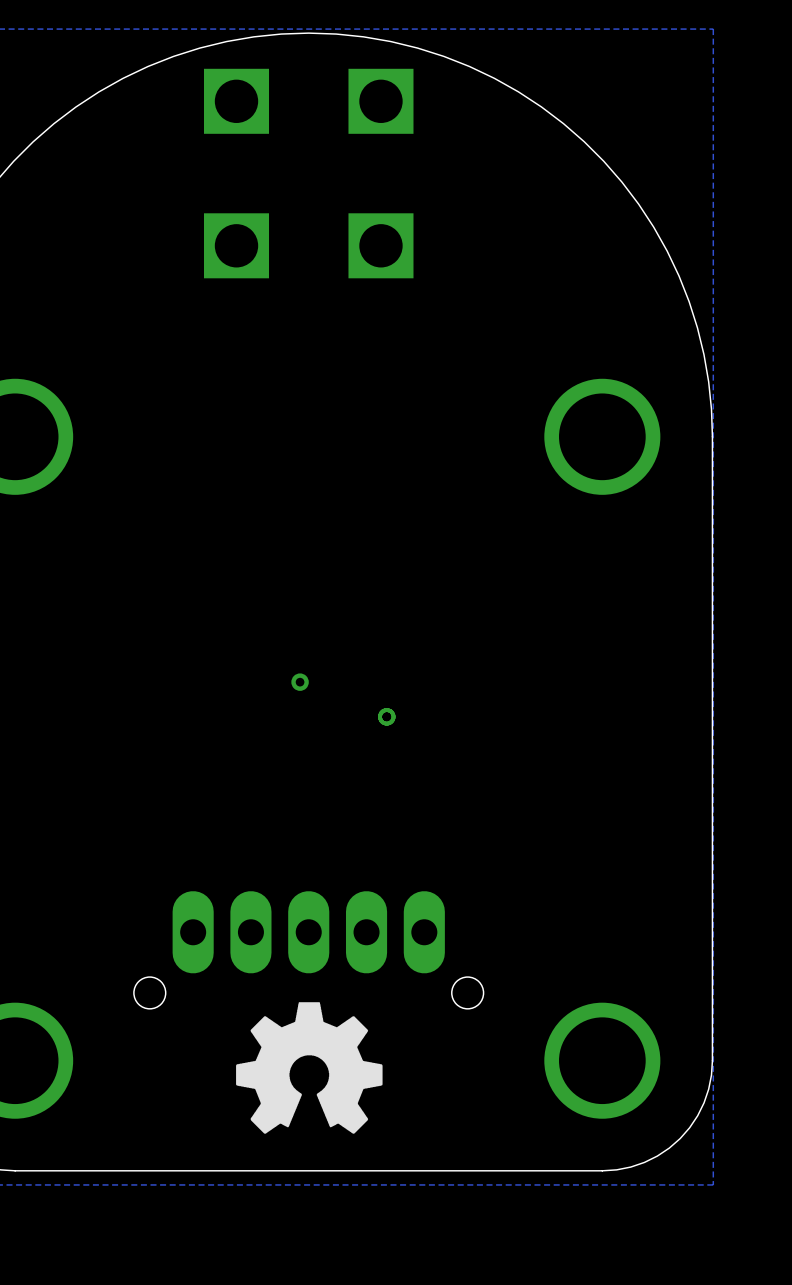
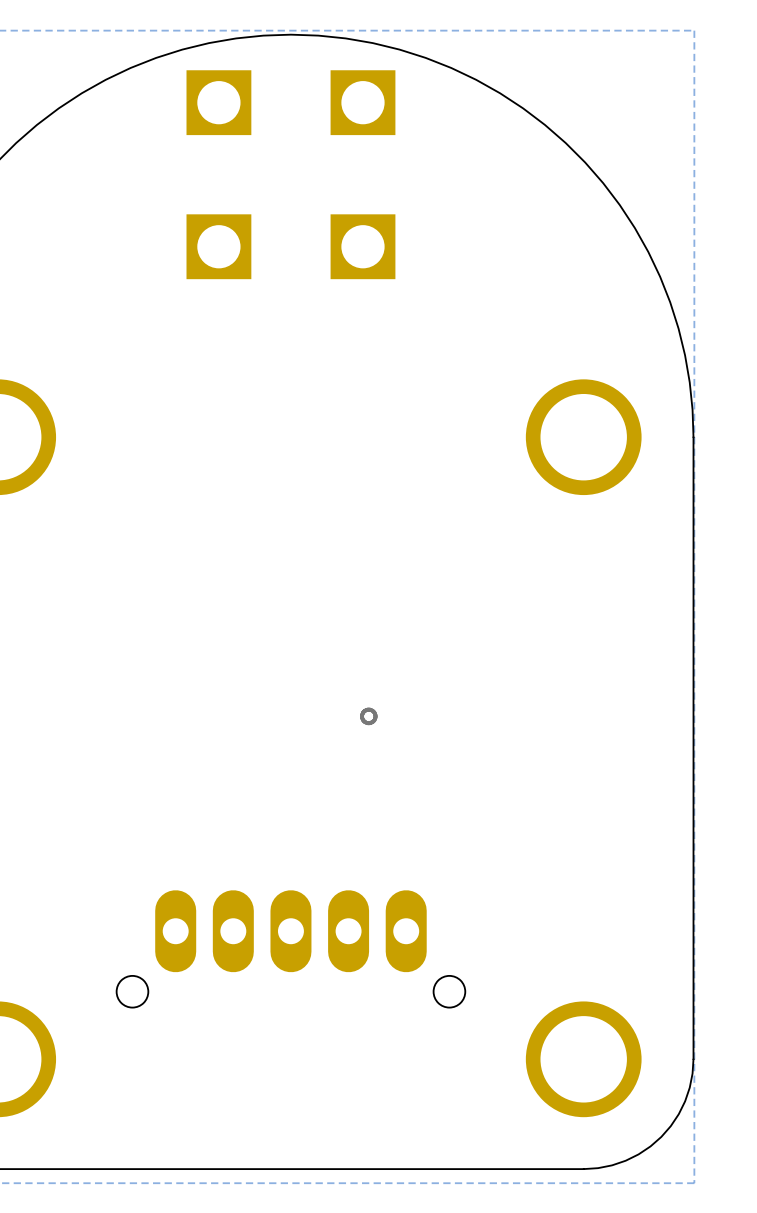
via: (300, 682) -> none
drawing: [236, 1002, 383, 1134] -> none

